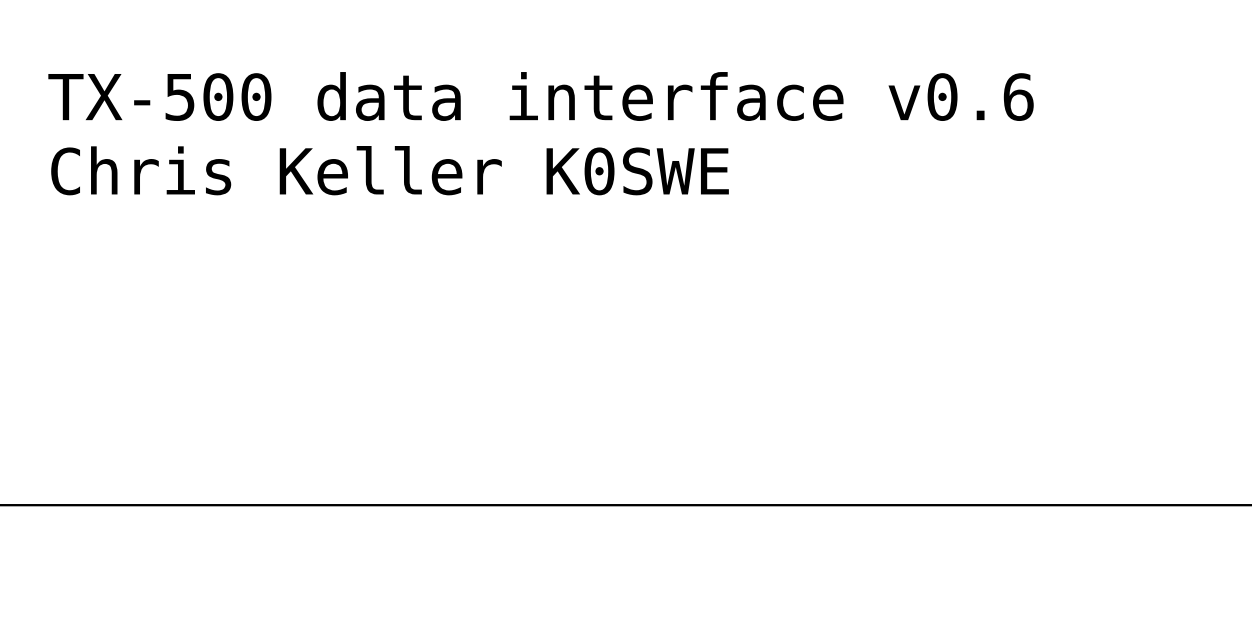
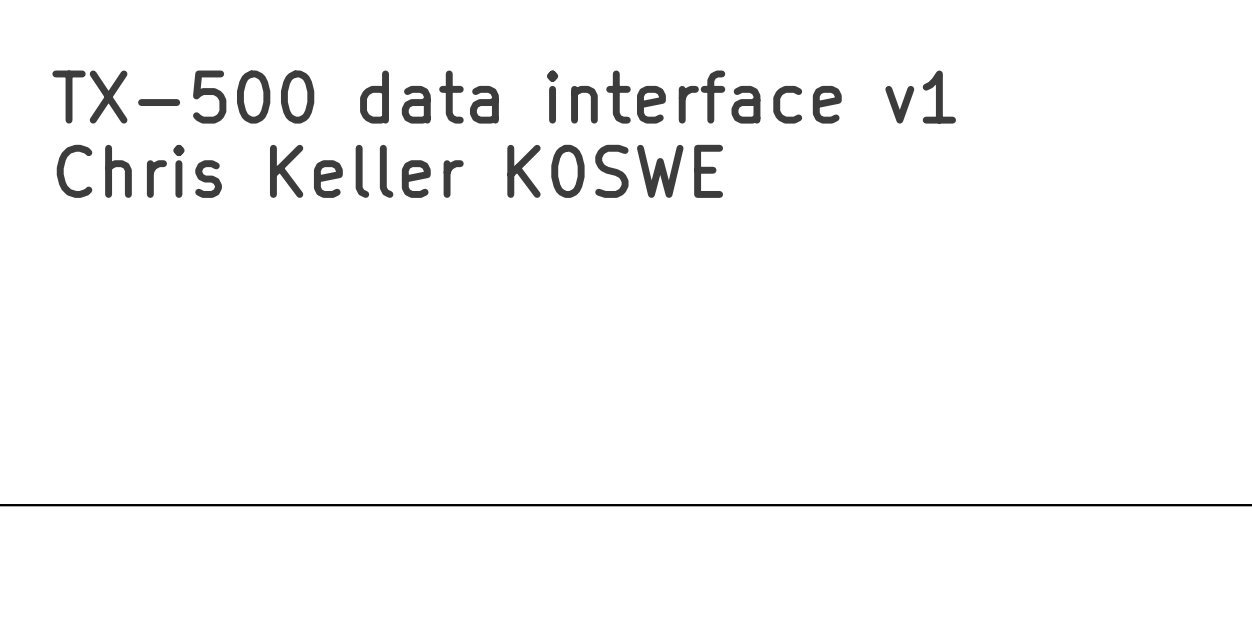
text: TX-500 data interface v0.6 (541, 96) -> TX-500 data interface v1 (504, 97)

